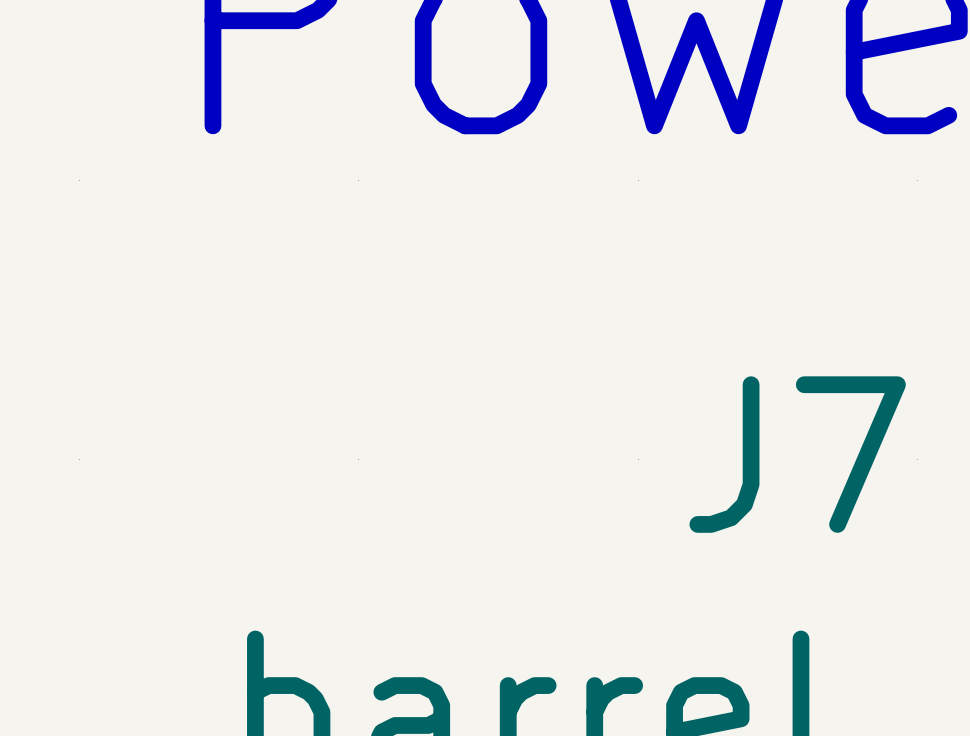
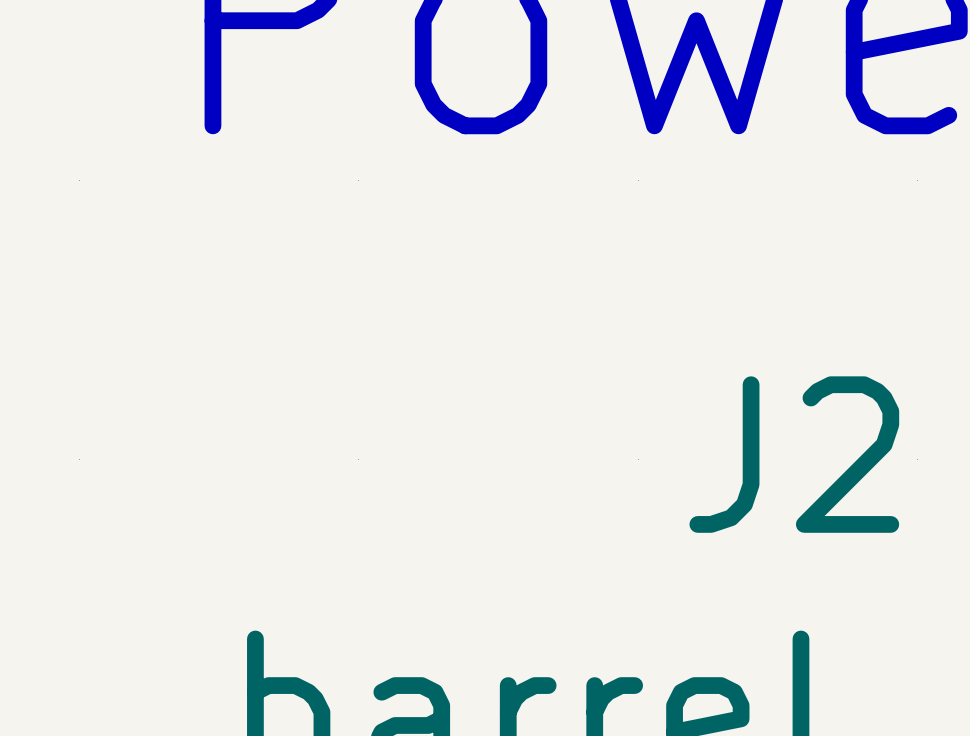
J7 name: J7 (797, 454) -> J2 (794, 454)

